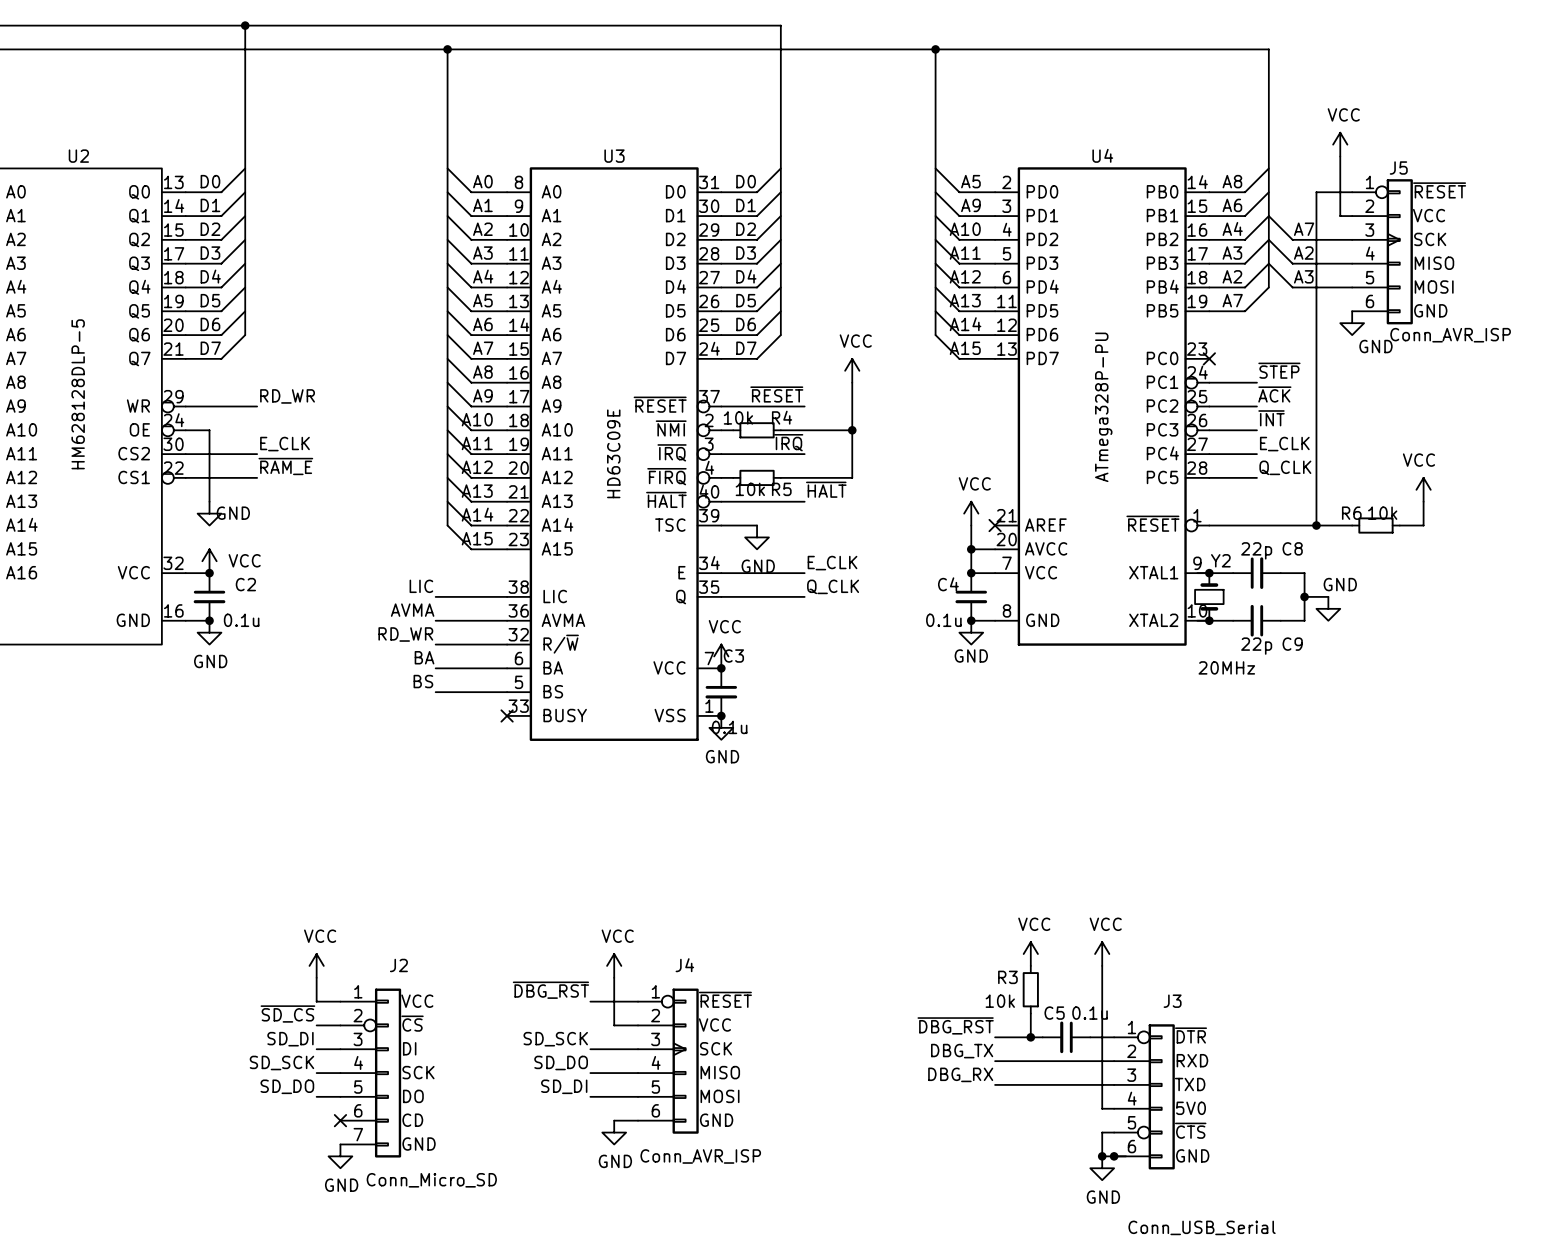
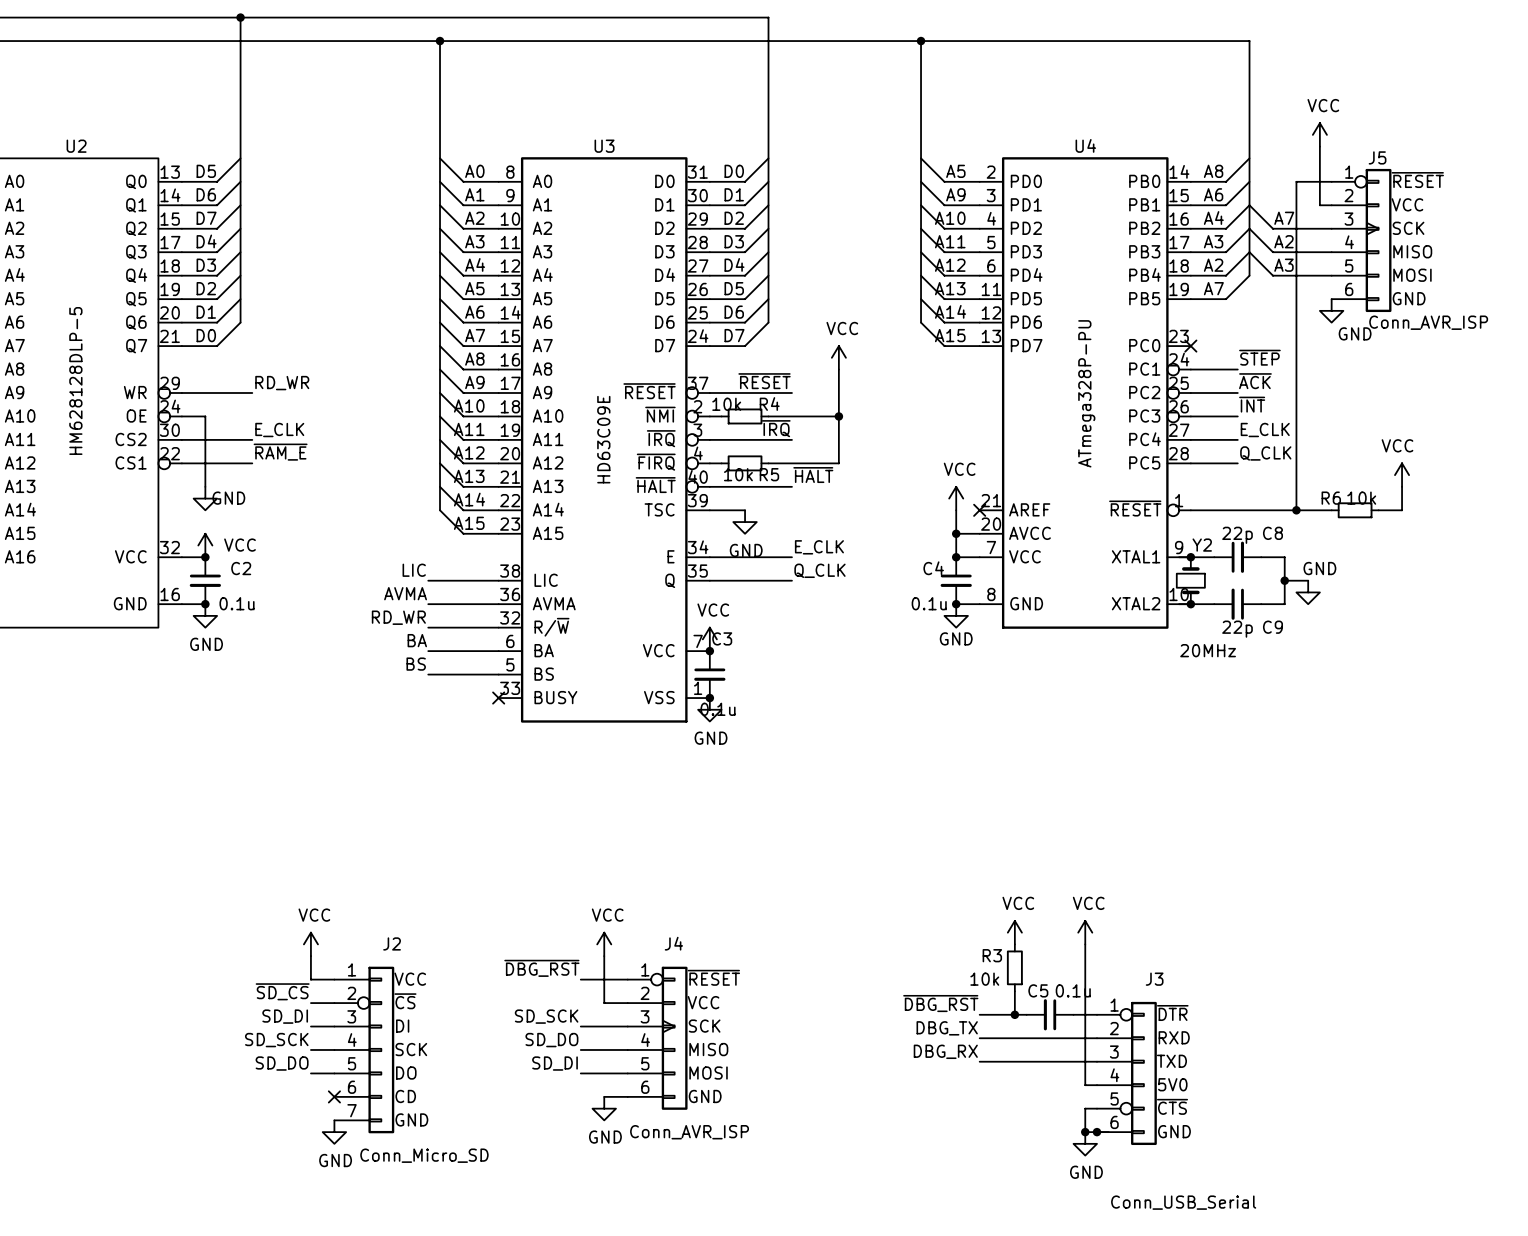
label: D0 (210, 181) -> D5 (206, 171)
label: D1 (210, 205) -> D6 (206, 194)
label: D2 (210, 229) -> D7 (206, 218)
label: D3 (210, 253) -> D4 (206, 241)
label: D4 (210, 276) -> D3 (206, 265)
label: D5 (210, 300) -> D2 (206, 288)
label: D6 (210, 324) -> D1 (206, 312)
label: D7 (210, 348) -> D0 (206, 335)

